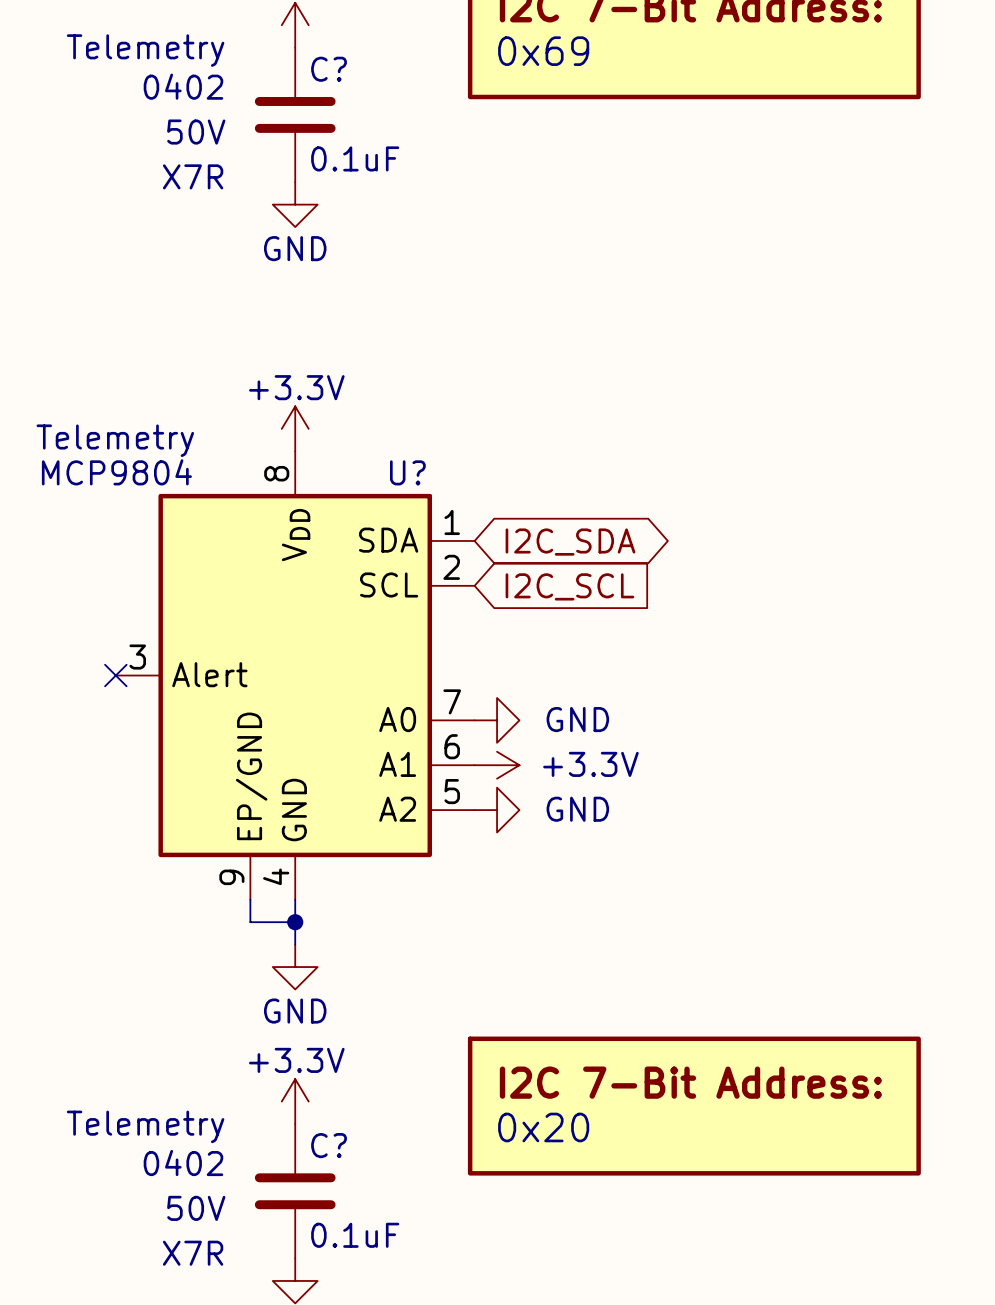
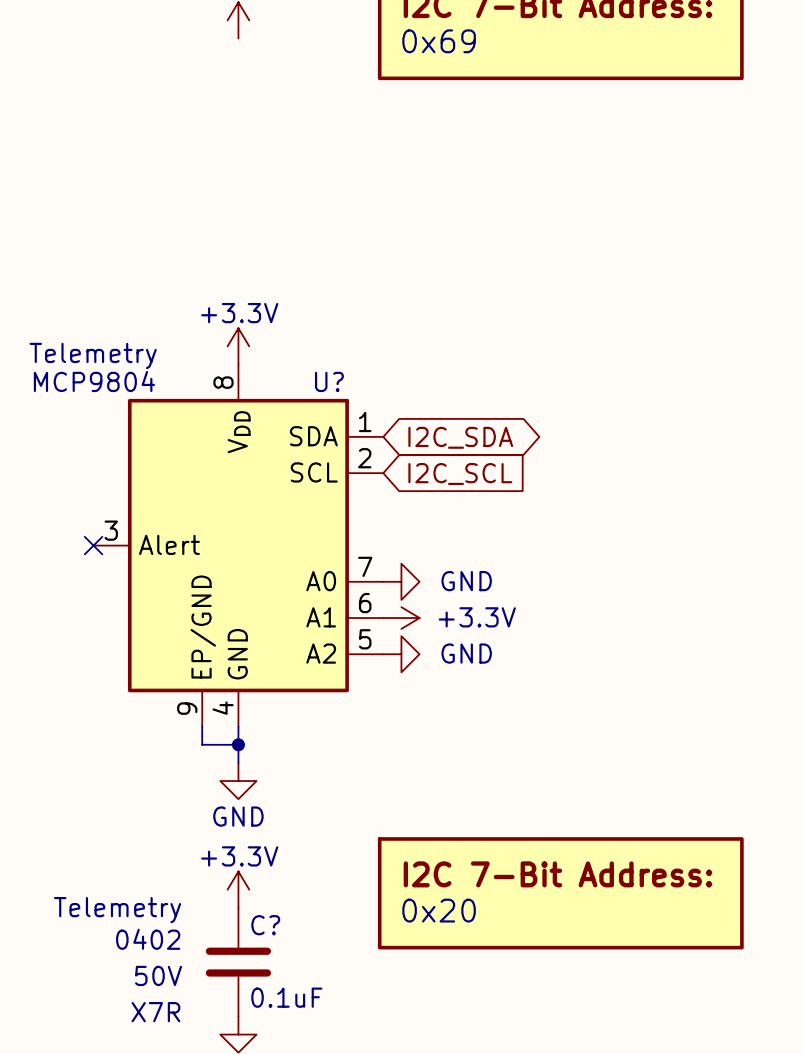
C?: 0.1uF (295, 114) -> none
power symbol: GND (295, 204) -> none

